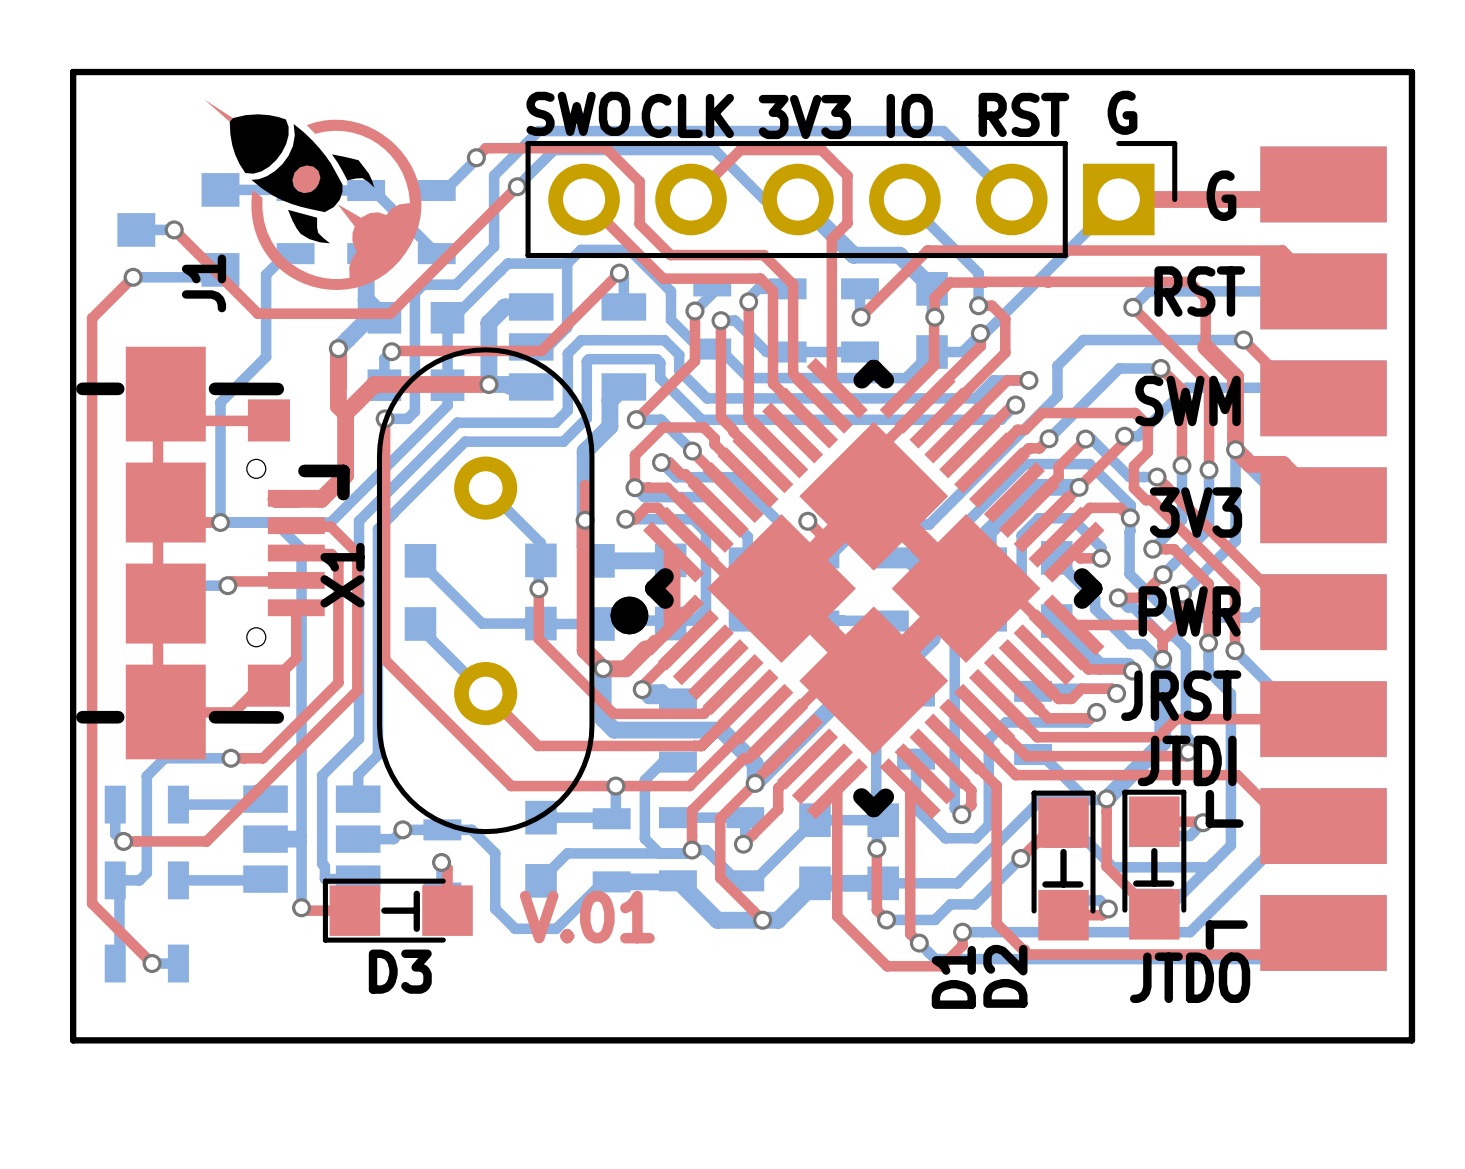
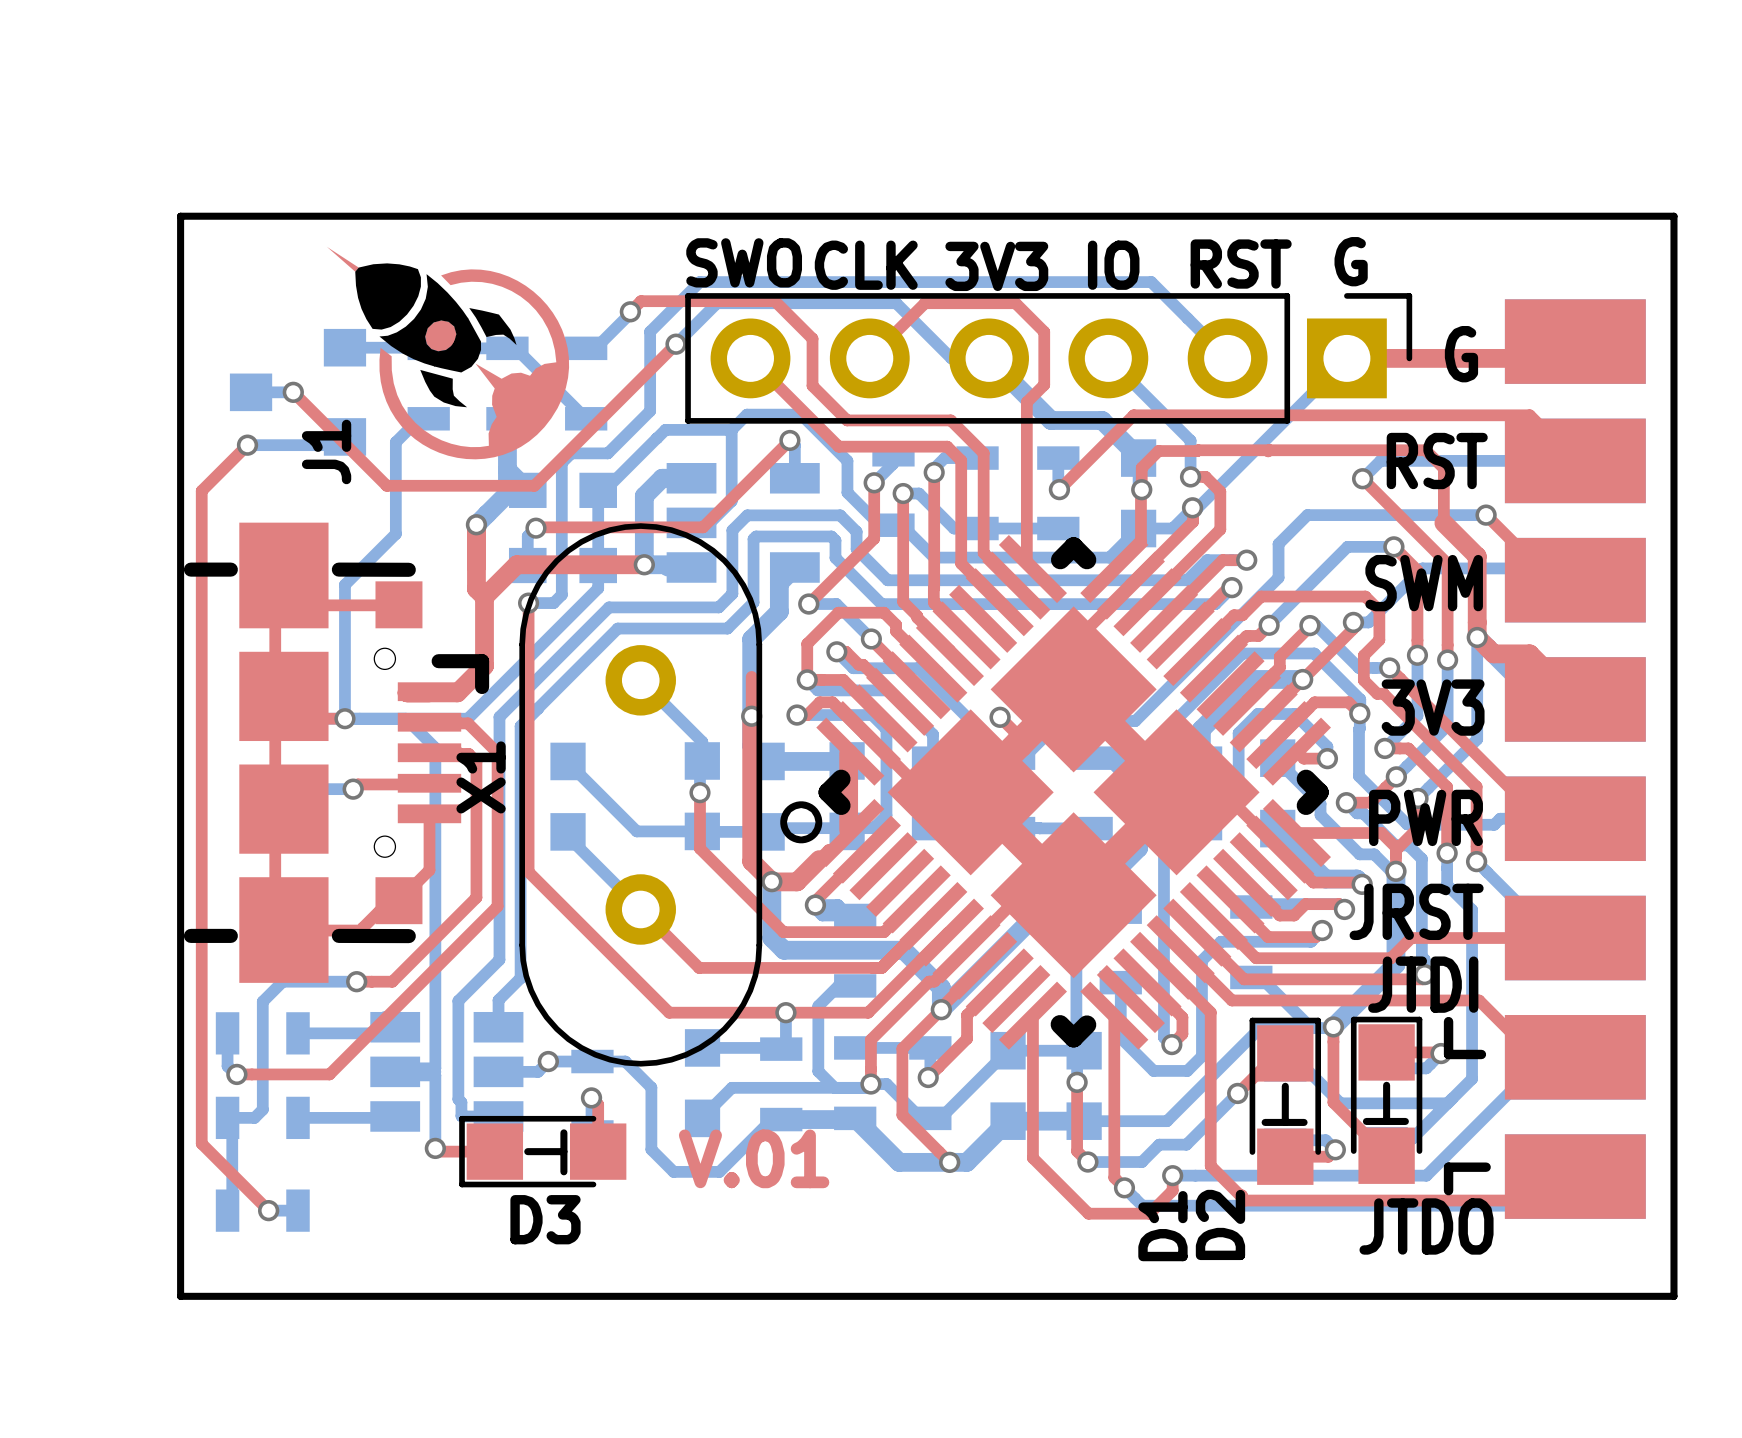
drawing: [376, 347, 649, 835] -> none
X1 footprint: [454, 456, 518, 726] -> [519, 523, 763, 1067]

